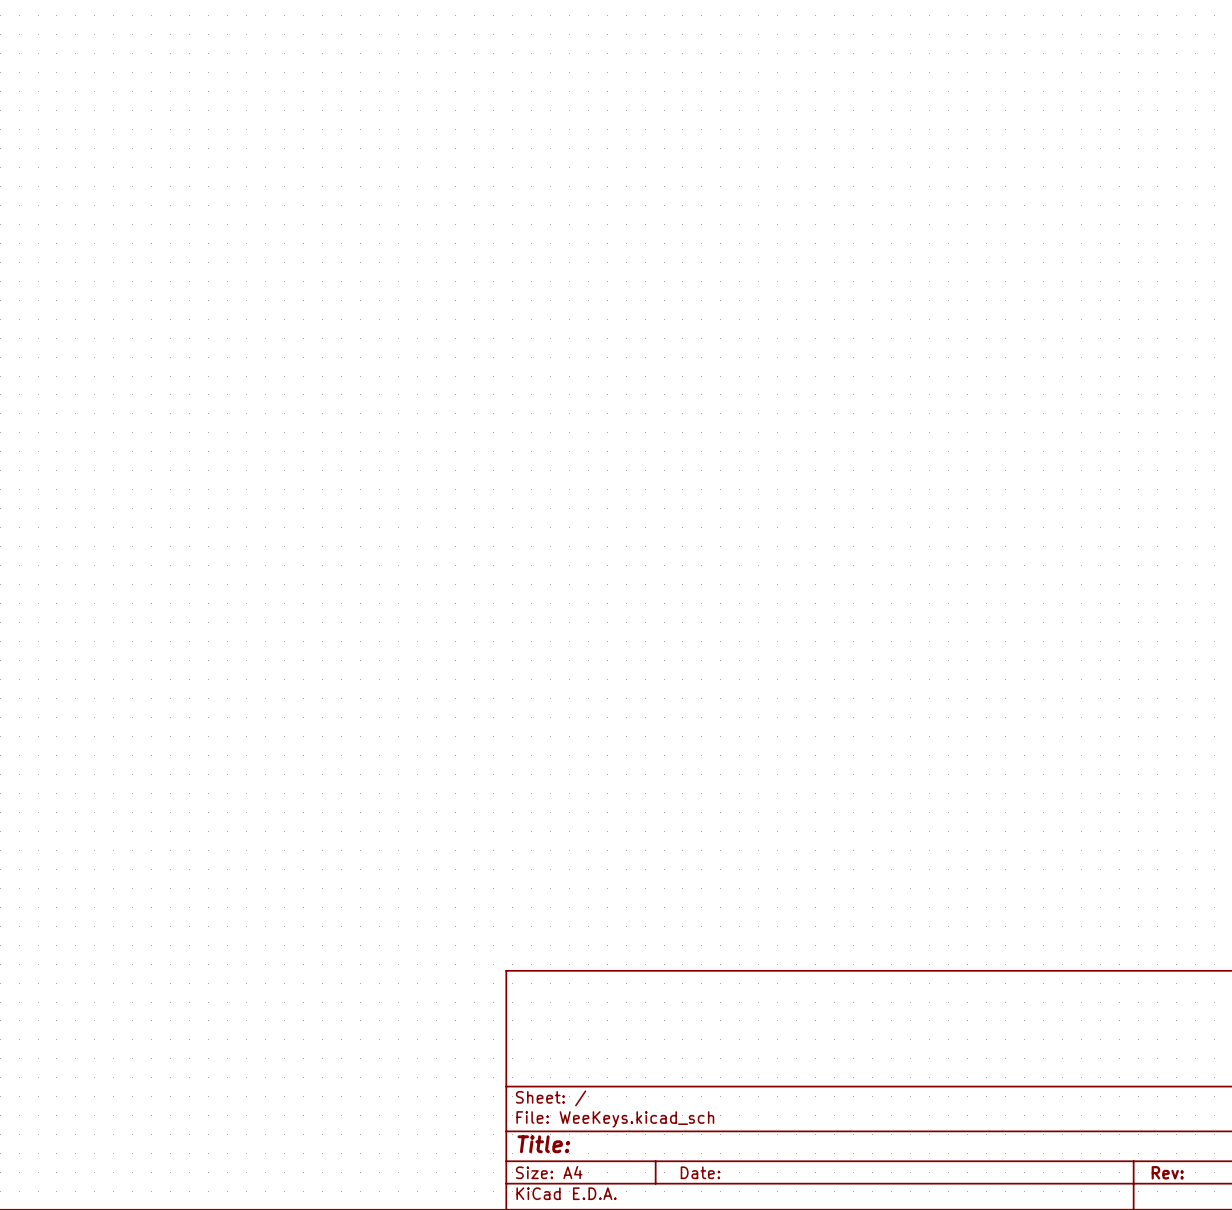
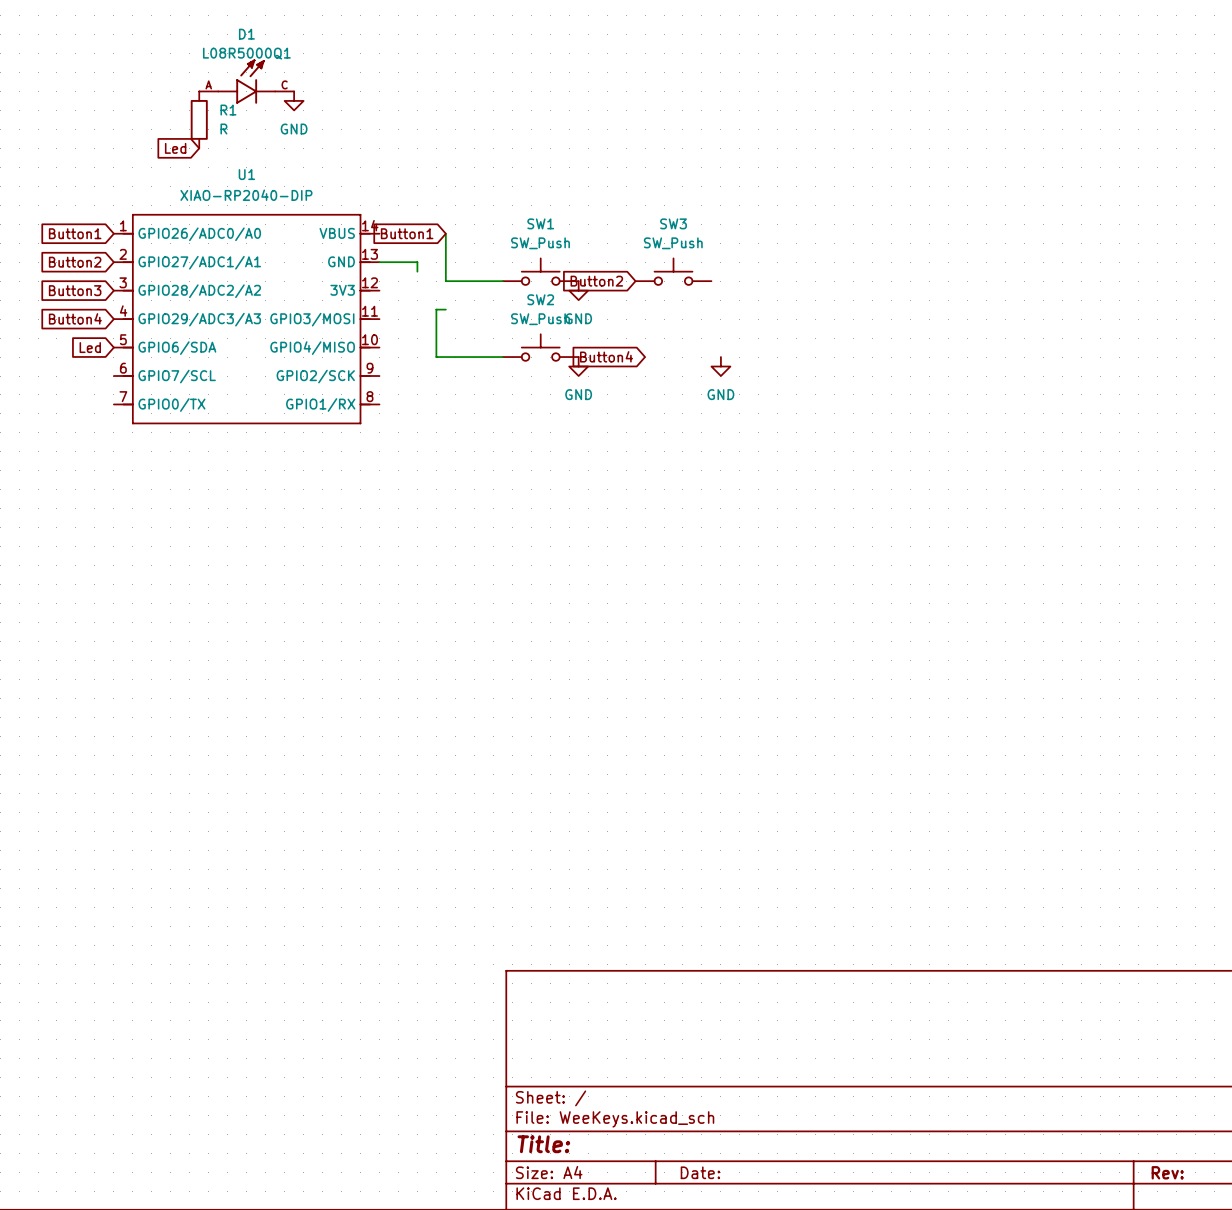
D1: none -> L08R5000Q1 (246, 81)
power symbol: none -> GND (294, 100)
R1: none -> R (199, 119)
global label: none -> Led (175, 148)
global label: none -> Button1 (75, 233)
global label: none -> Button1 (407, 233)
wire: none -> (445, 233) (445, 281) (502, 281)
global label: none -> Button2 (75, 262)
wire: none -> (379, 262) (417, 262) (417, 271)
SW1: none -> SW_Push (540, 271)
SW3: none -> SW_Push (673, 271)
global label: none -> Button2 (596, 281)
global label: none -> Button3 (75, 290)
power symbol: none -> GND (578, 290)
wire: none -> (445, 309) (436, 309) (436, 357) (502, 357)
global label: none -> Button4 (75, 318)
U1: none -> XIAO-RP2040-DIP (246, 319)
global label: none -> Led (90, 347)
SW2: none -> SW_Push (540, 347)
global label: none -> Button4 (606, 356)
power symbol: none -> GND (578, 366)
power symbol: none -> GND (720, 366)

